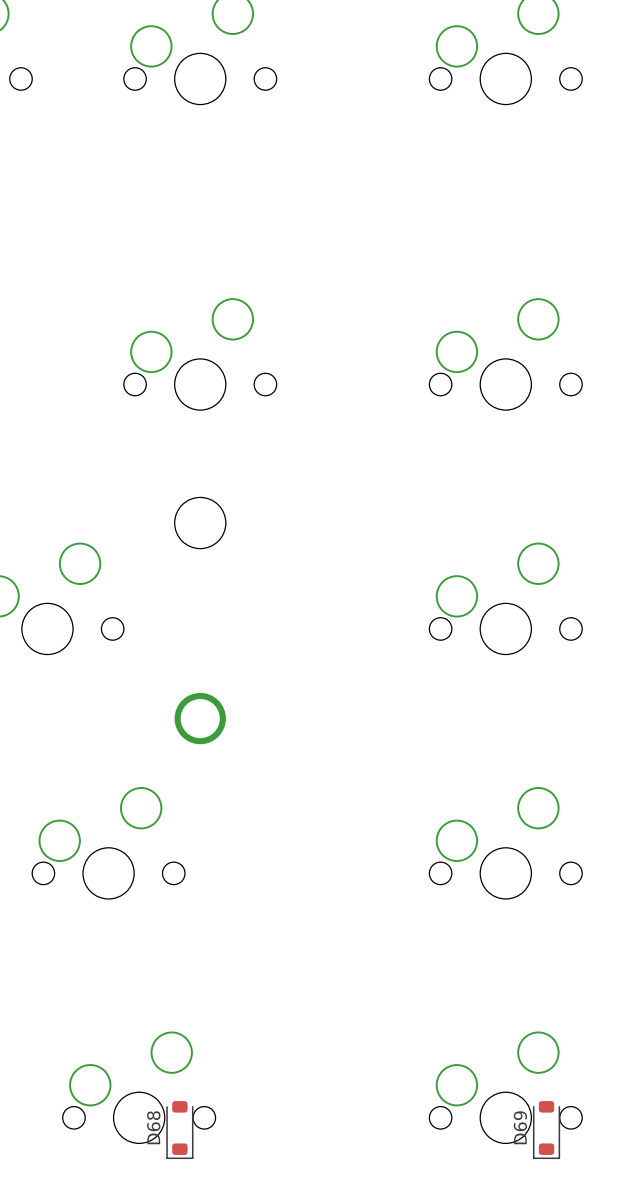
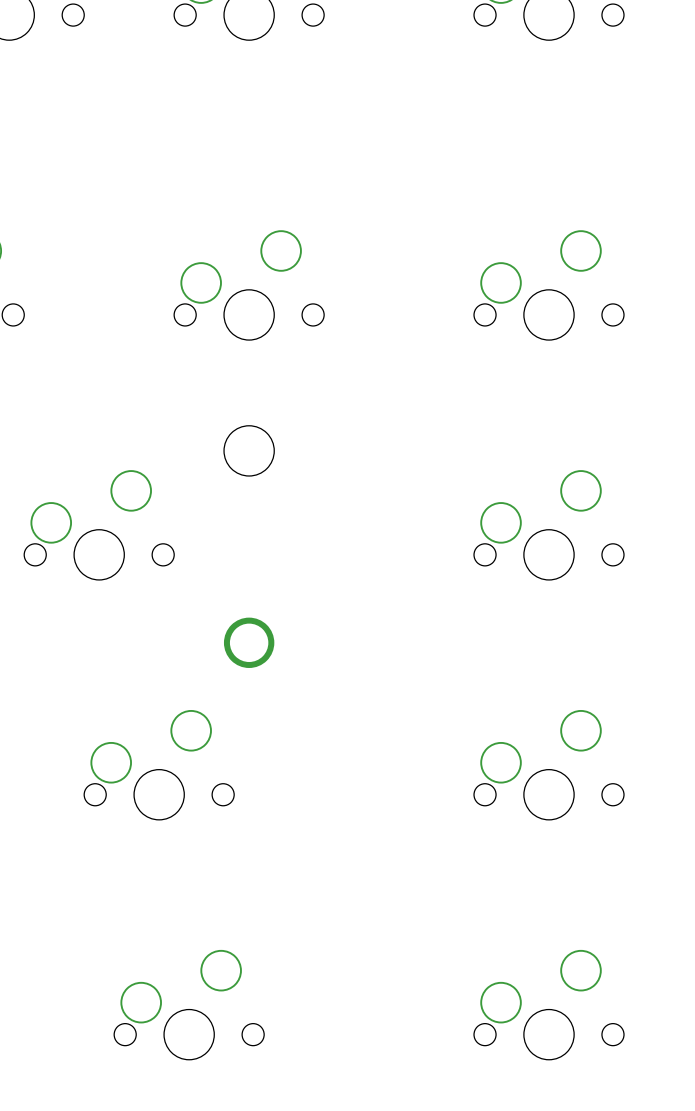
D68: (179, 1130) -> none
D69: (546, 1130) -> none

